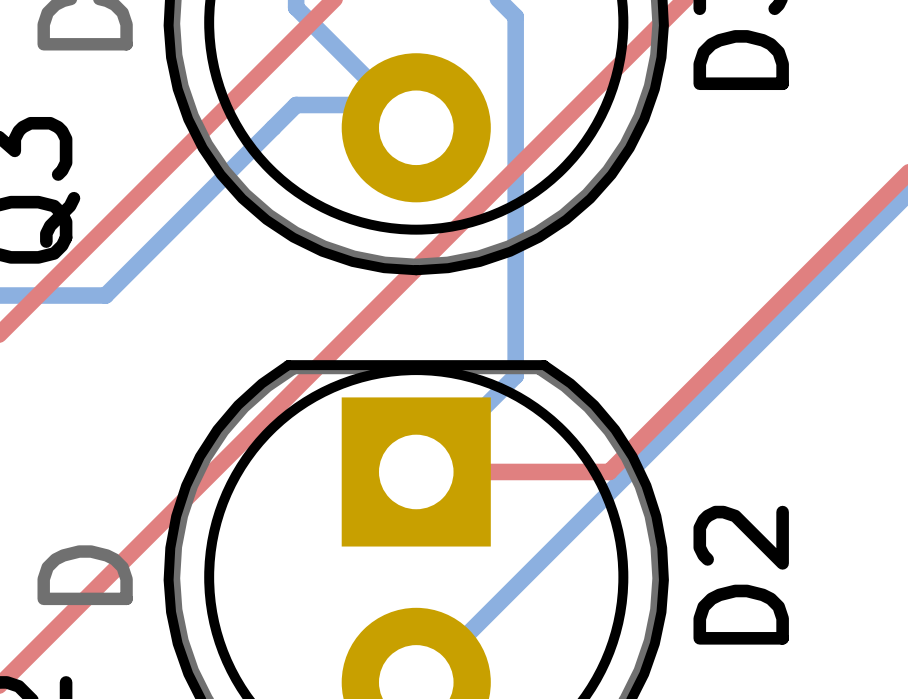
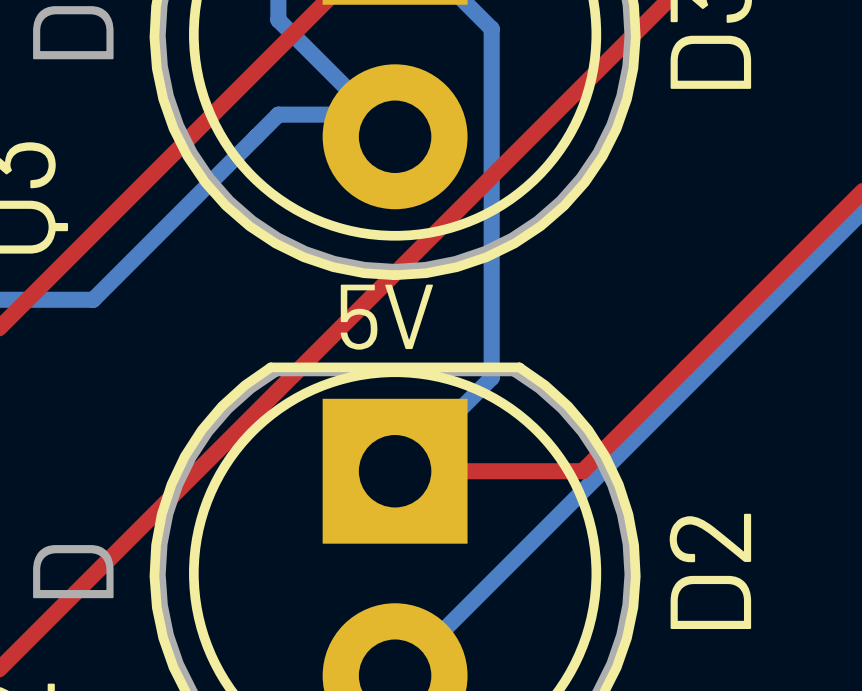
text: none -> 5V (386, 317)

